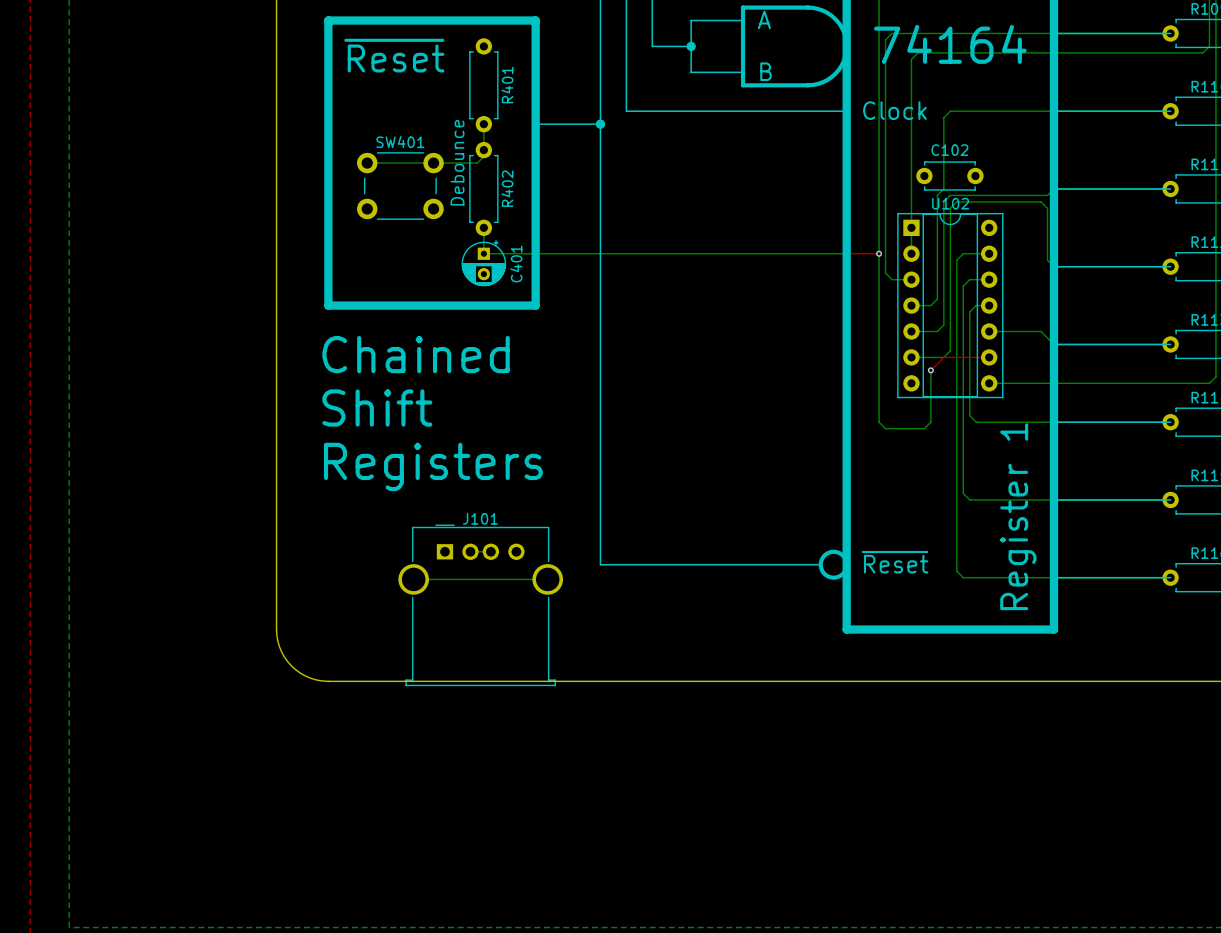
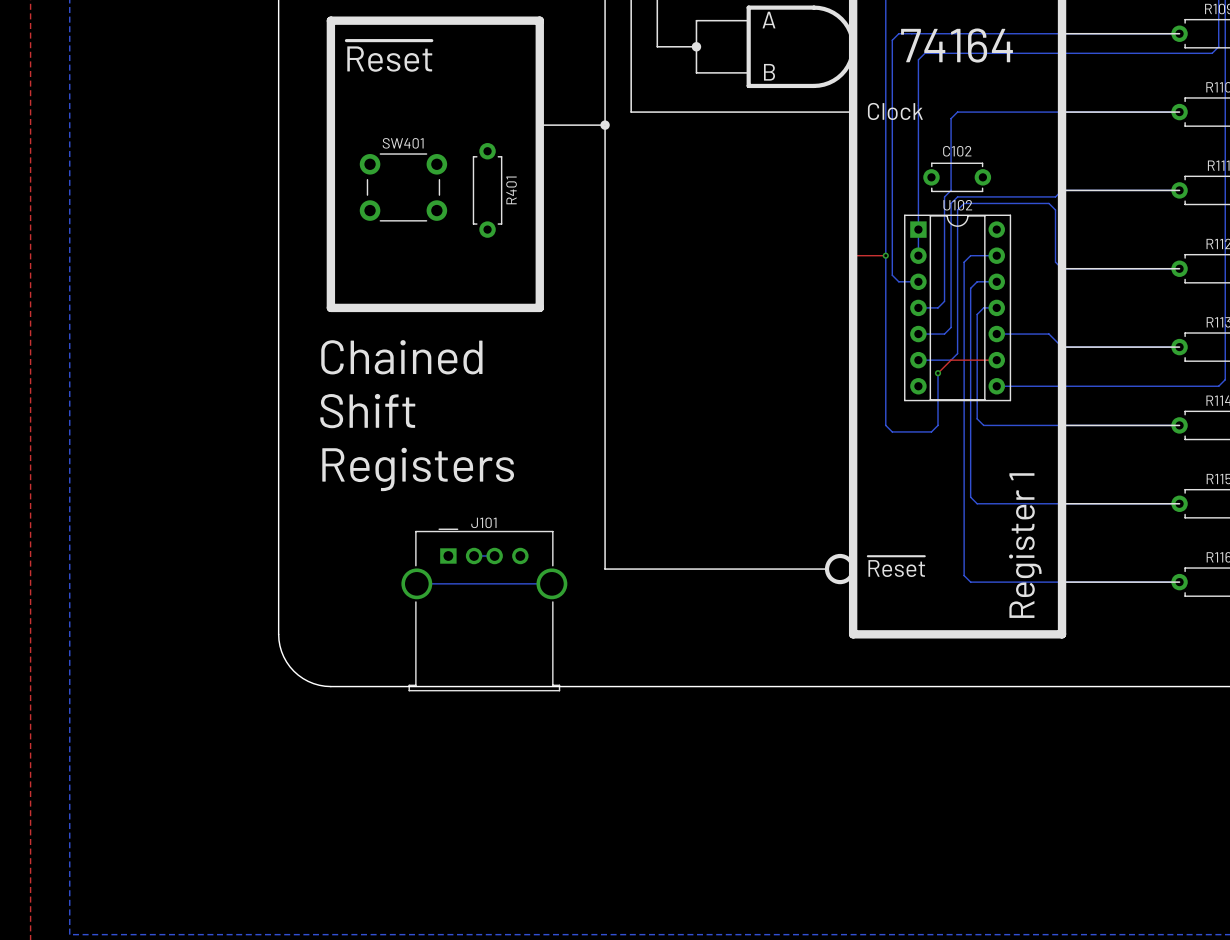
R401: (483, 85) -> none
bottom track: (483, 124) (483, 156) (477, 163) (367, 163) -> none
text: Debounce (457, 162) -> none
R402 name: R402 (507, 188) -> R401 (511, 190)
bottom track: (483, 227) (483, 253) (846, 253) -> none
C401: (483, 263) -> none

